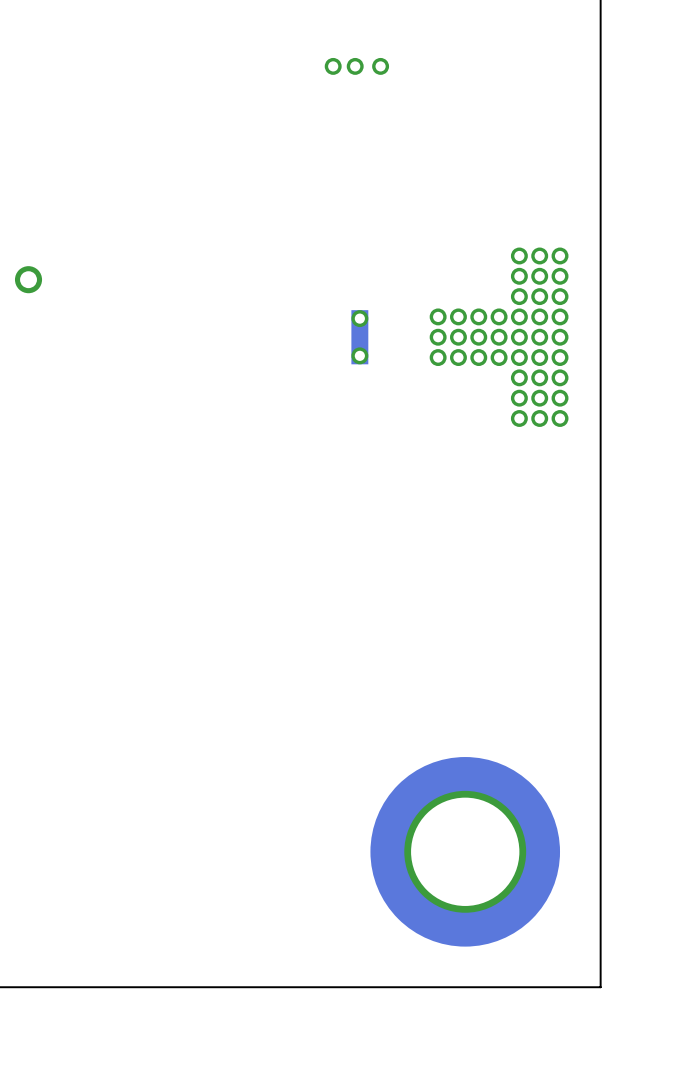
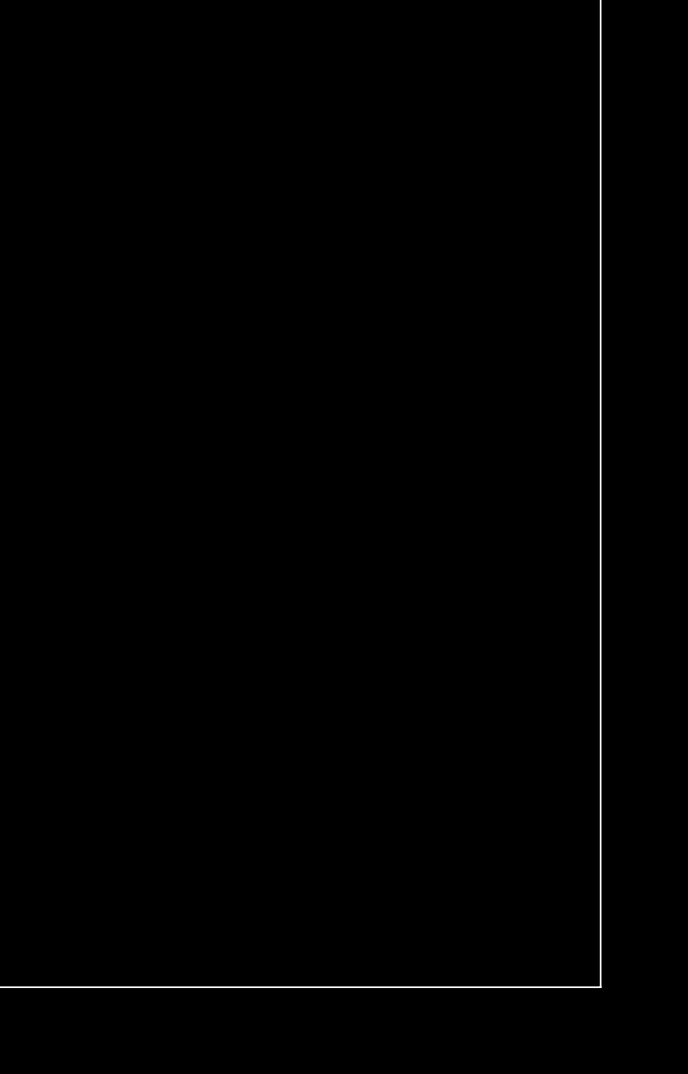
via: (333, 66) -> none
via: (355, 66) -> none
via: (380, 66) -> none
via: (519, 255) -> none
via: (539, 255) -> none
via: (560, 255) -> none
via: (519, 276) -> none
via: (539, 276) -> none
via: (560, 276) -> none
via: (28, 279) -> none
via: (519, 296) -> none
via: (539, 296) -> none
via: (560, 296) -> none
via: (438, 316) -> none
via: (458, 316) -> none
via: (478, 316) -> none
via: (499, 316) -> none
via: (519, 316) -> none
via: (539, 316) -> none
via: (560, 316) -> none
part: (359, 337) -> none
via: (438, 337) -> none
via: (458, 337) -> none
via: (478, 337) -> none
via: (499, 337) -> none
via: (519, 337) -> none
via: (539, 337) -> none
via: (560, 337) -> none
via: (438, 357) -> none
via: (458, 357) -> none
via: (478, 357) -> none
via: (499, 357) -> none
via: (519, 357) -> none
via: (539, 357) -> none
via: (560, 357) -> none
via: (519, 377) -> none
via: (539, 377) -> none
via: (560, 377) -> none
via: (519, 398) -> none
via: (539, 398) -> none
via: (560, 398) -> none
via: (519, 418) -> none
via: (539, 418) -> none
via: (560, 418) -> none
part: (465, 851) -> none

